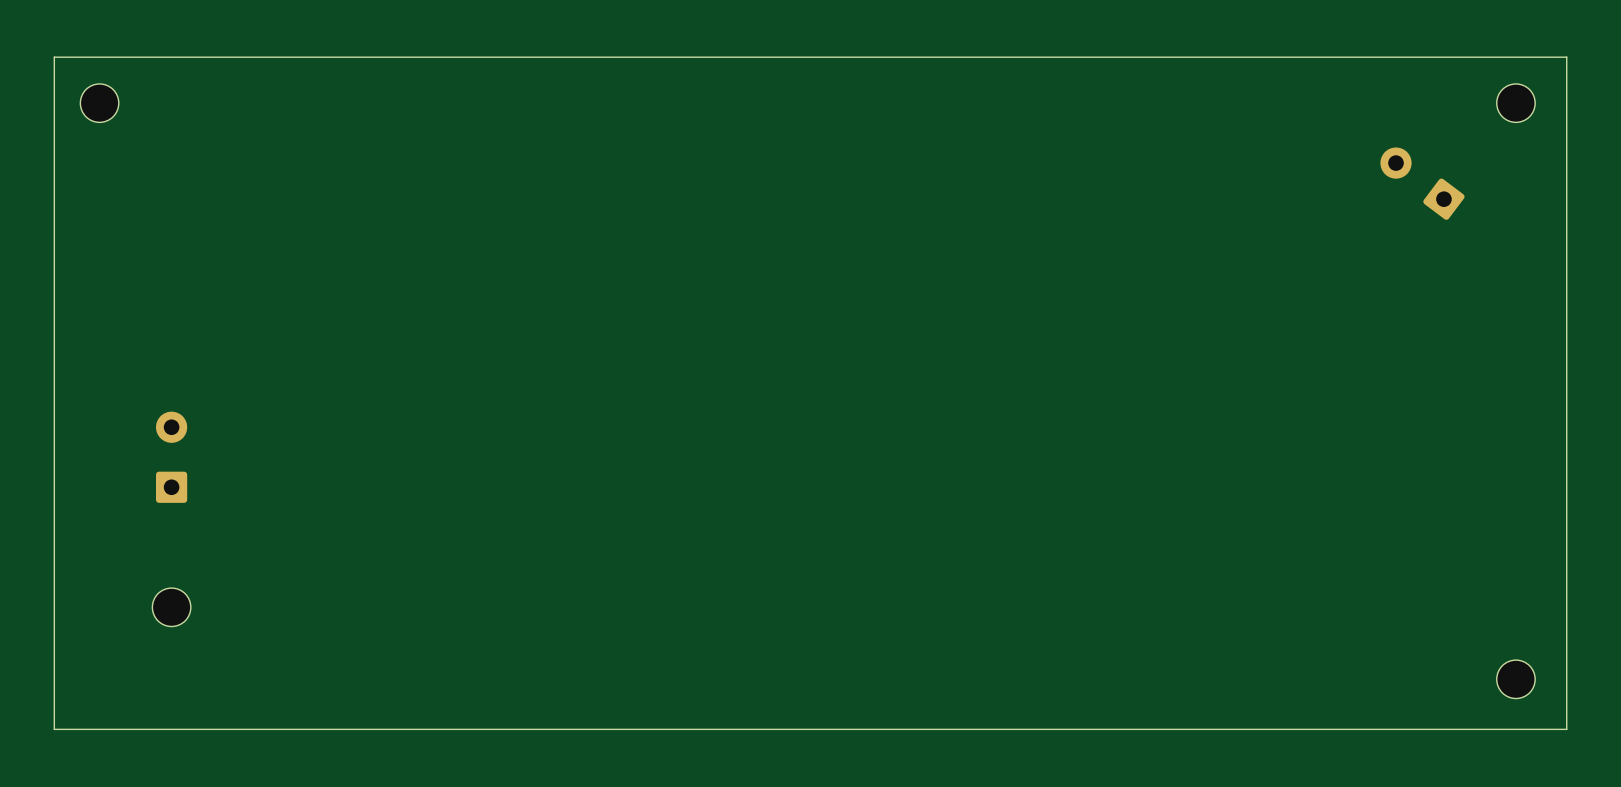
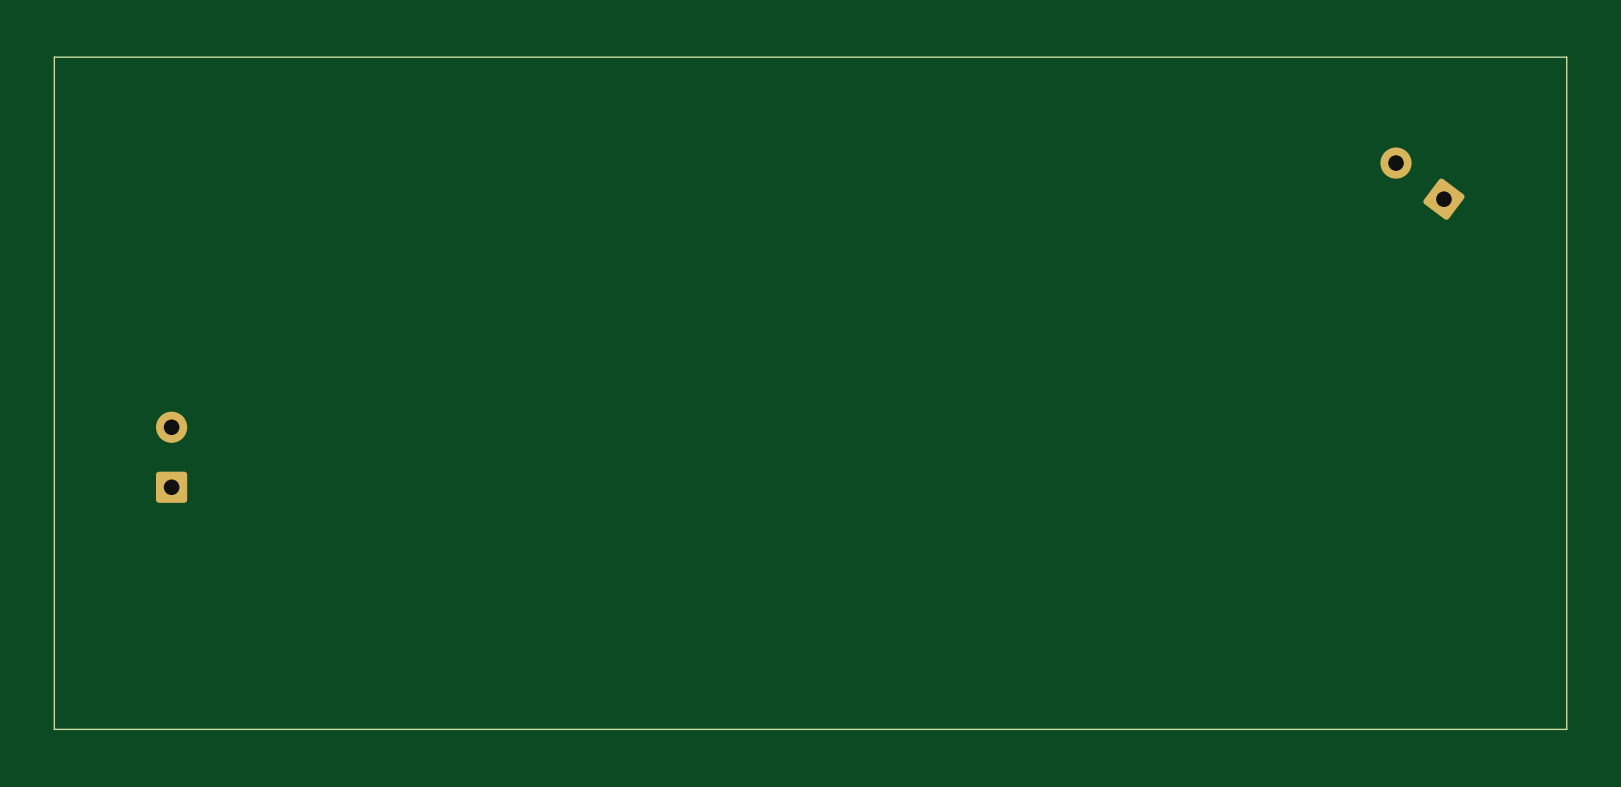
part: (99, 103) -> none
part: (1515, 103) -> none
part: (171, 607) -> none
part: (1515, 679) -> none

